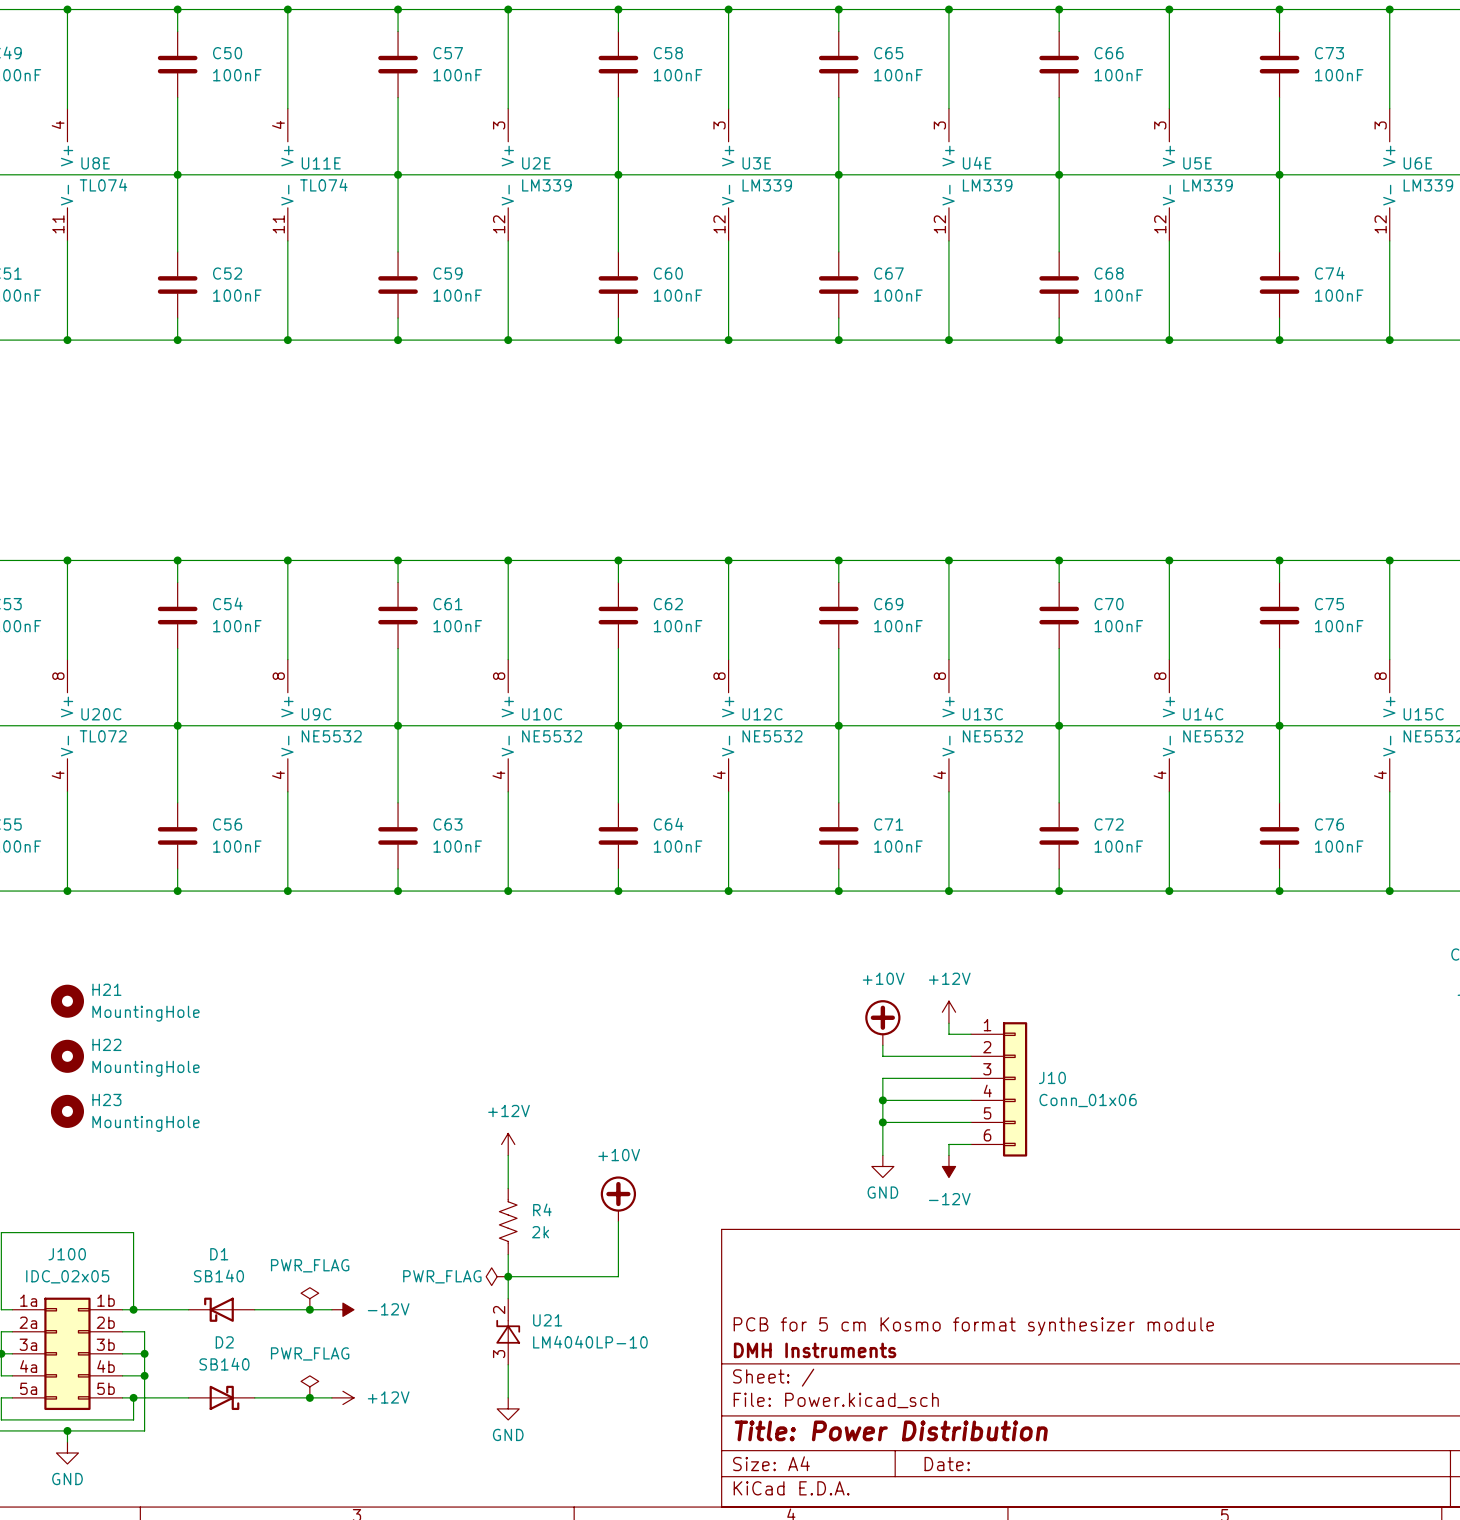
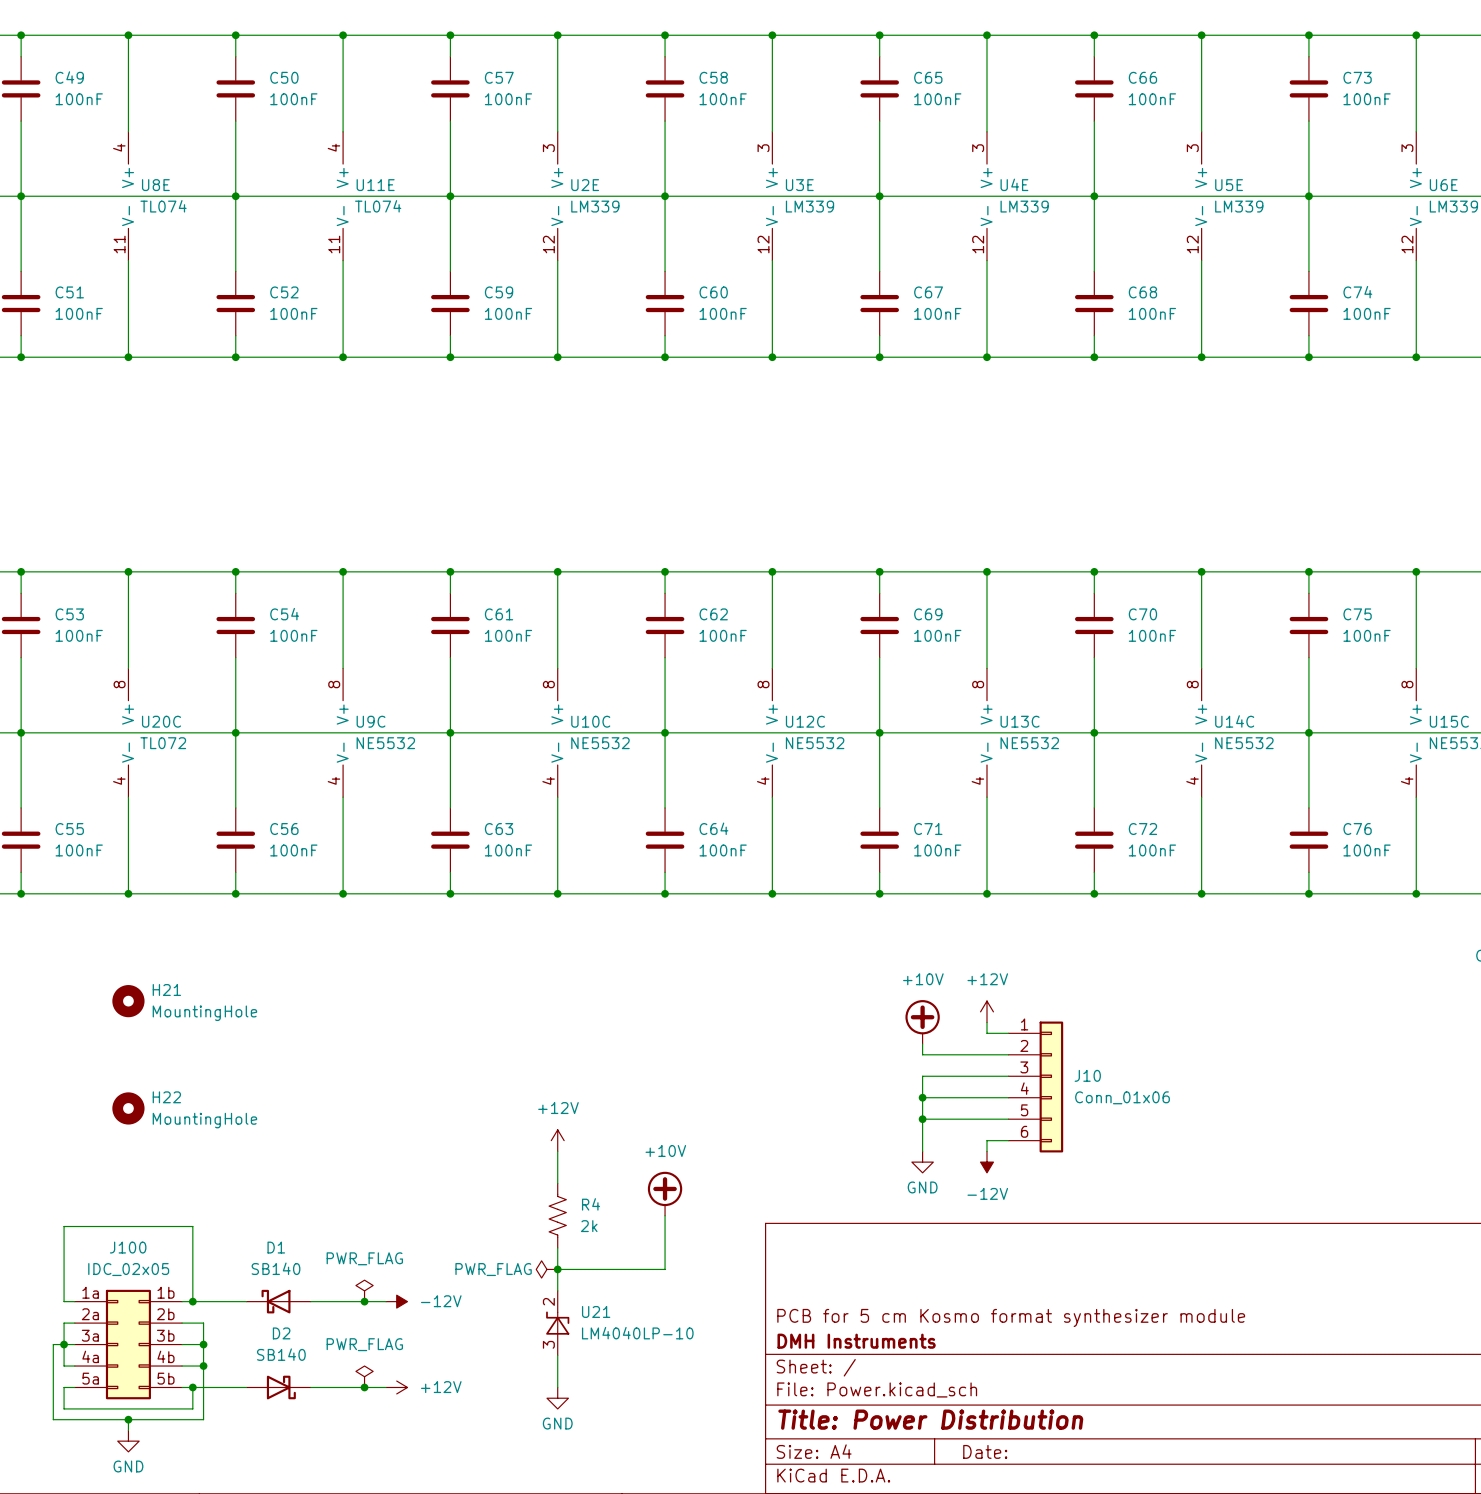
H22: MountingHole (67, 1056) -> none
H23 name: H23 (106, 1099) -> H22 (166, 1097)

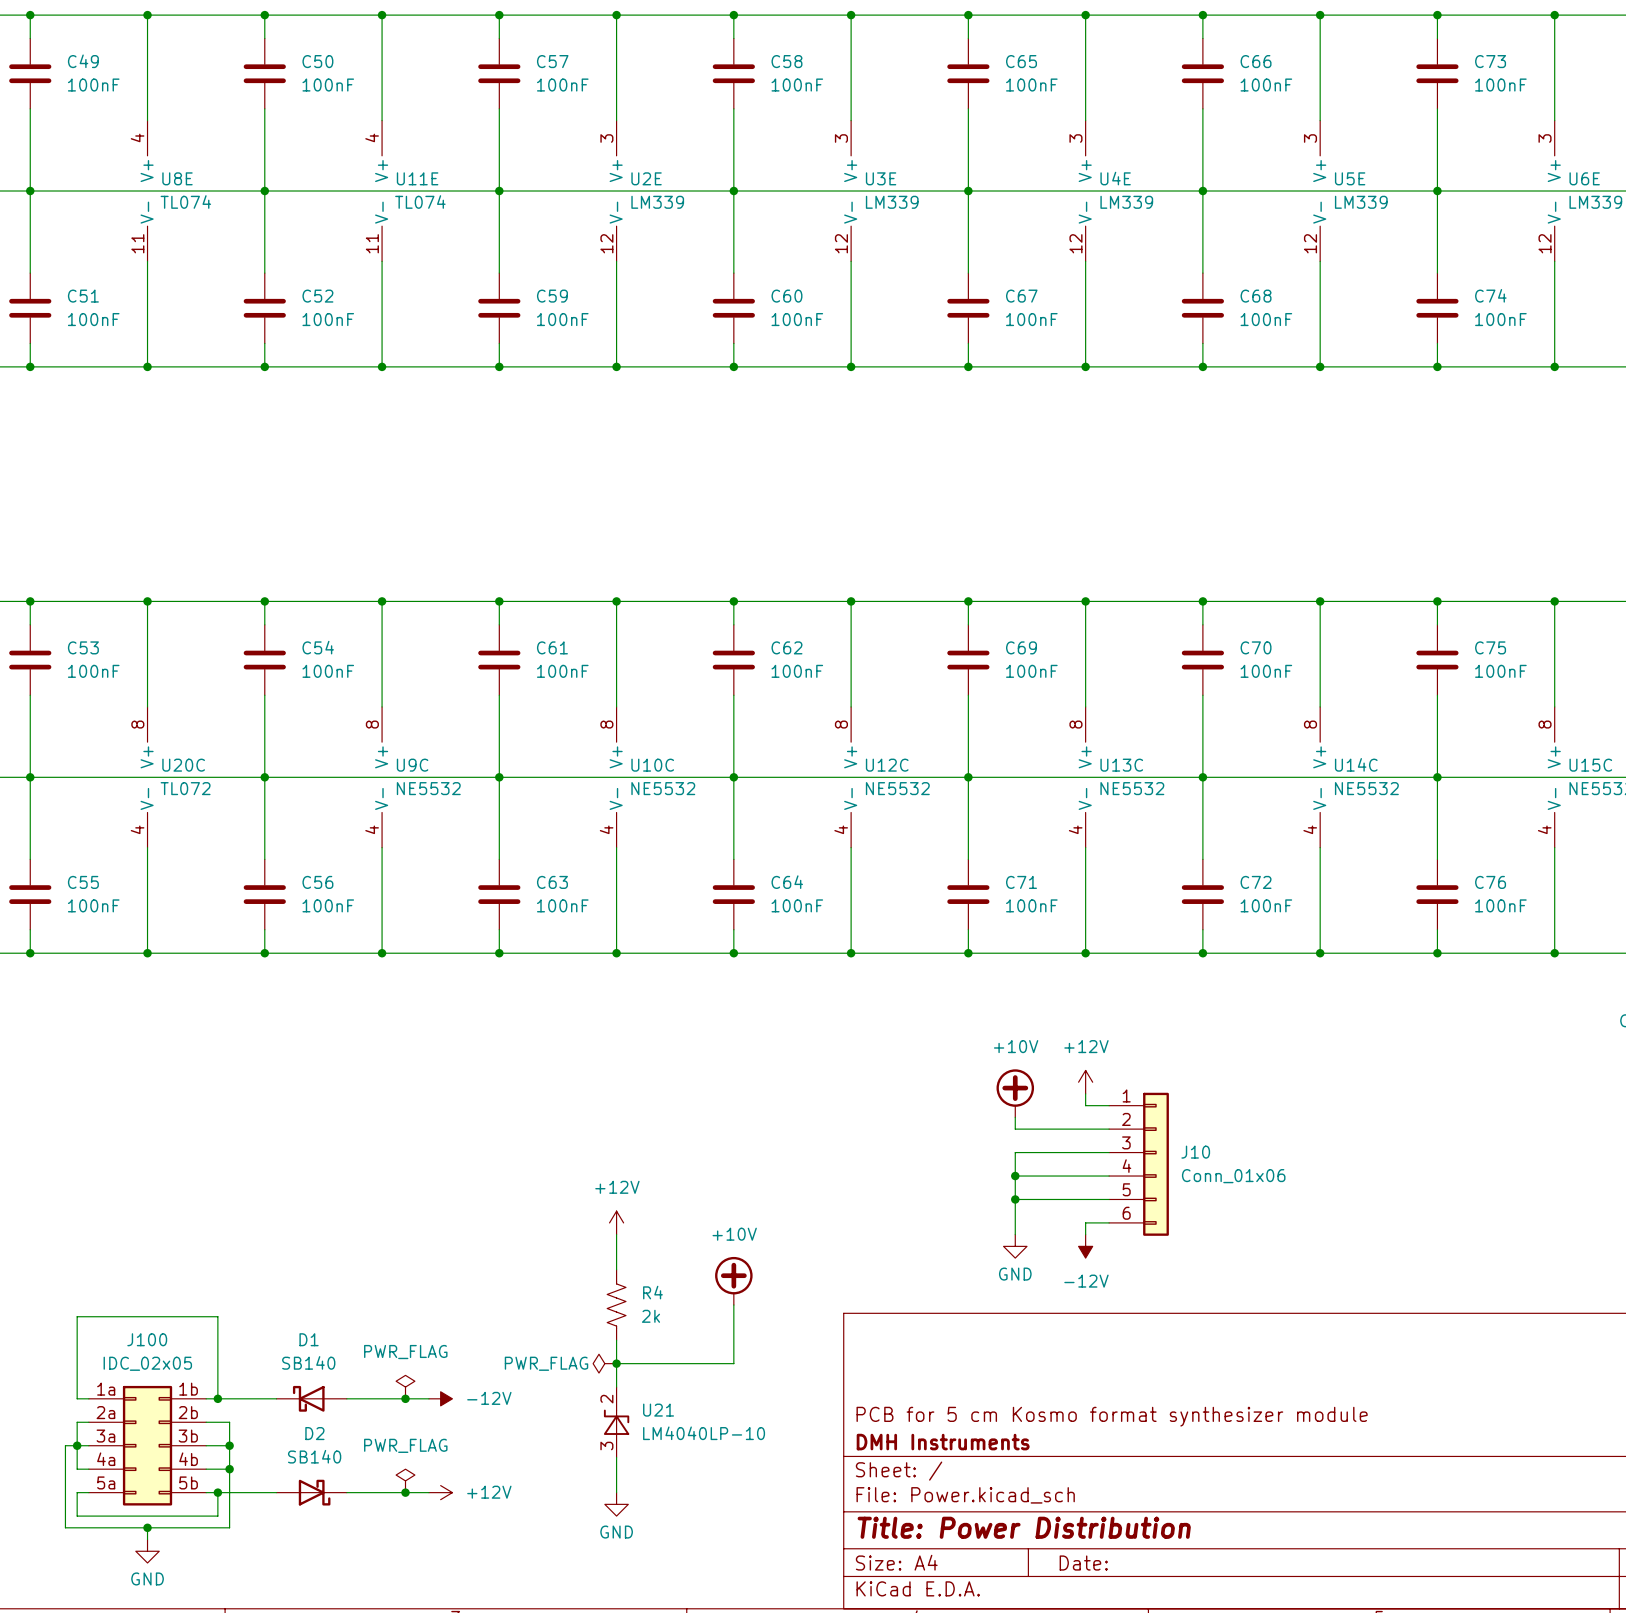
H21: MountingHole (128, 1001) -> none
H22: MountingHole (128, 1108) -> none

